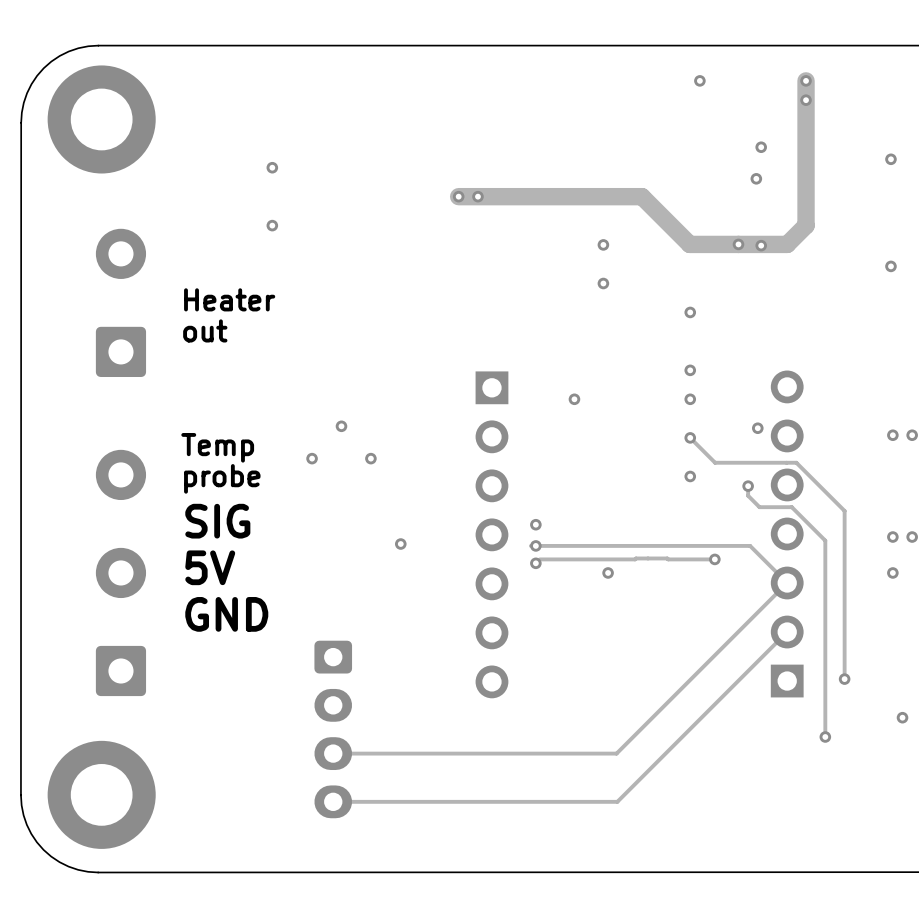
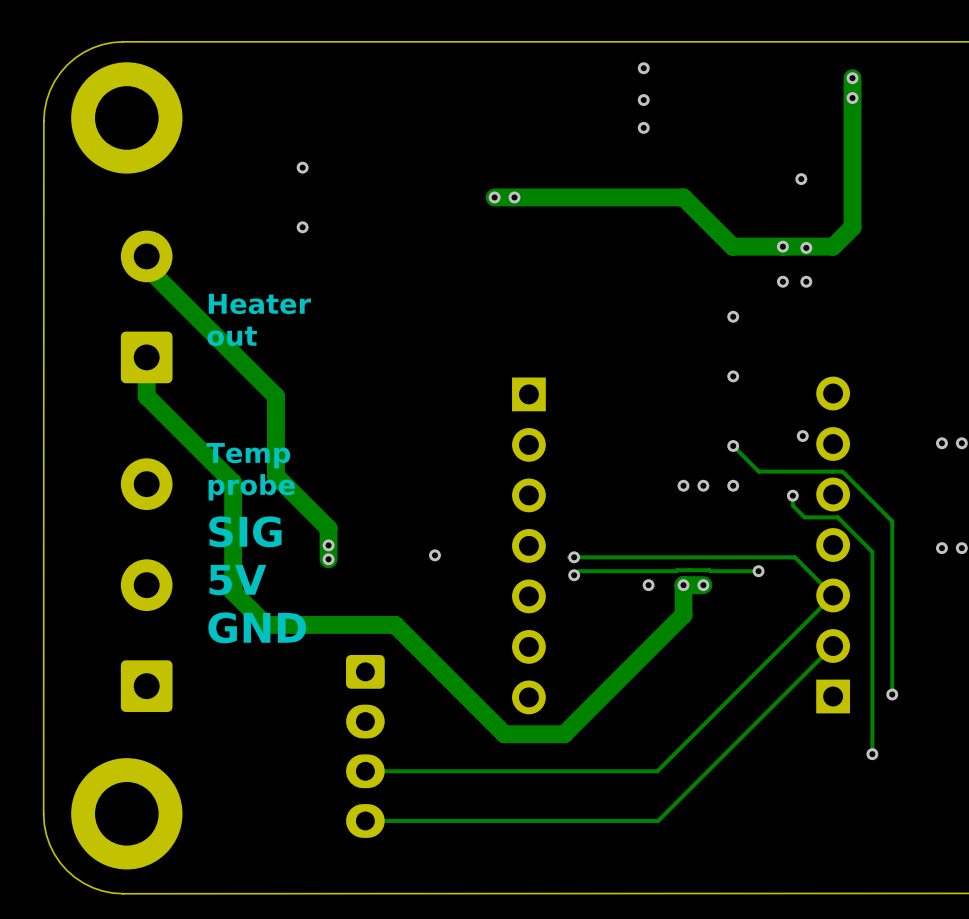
via: none -> (643, 68)
via: (699, 80) -> none
via: none -> (643, 100)
via: none -> (643, 127)
via: (761, 147) -> none
via: (890, 159) -> none
via: (603, 244) -> none
track: none -> (146, 267) (275, 396) (275, 475) (328, 528) (328, 559)
via: (890, 266) -> none
via: none -> (782, 281)
via: none -> (806, 281)
via: (603, 283) -> none
track: none -> (146, 357) (146, 396) (233, 482) (233, 592) (265, 624) (395, 624) (504, 734) (564, 734) (683, 614) (683, 585) (703, 585)
via: (574, 399) -> none
via: (690, 399) -> none
via: (341, 426) -> none
via: (312, 458) -> none
via: (370, 458) -> none
via: none -> (683, 485)
via: none -> (703, 485)
via: (535, 524) -> none
via: none -> (328, 545)
via: none -> (328, 559)
via: none -> (683, 585)
via: none -> (703, 585)
via: (892, 572) -> none
via: (902, 717) -> none

